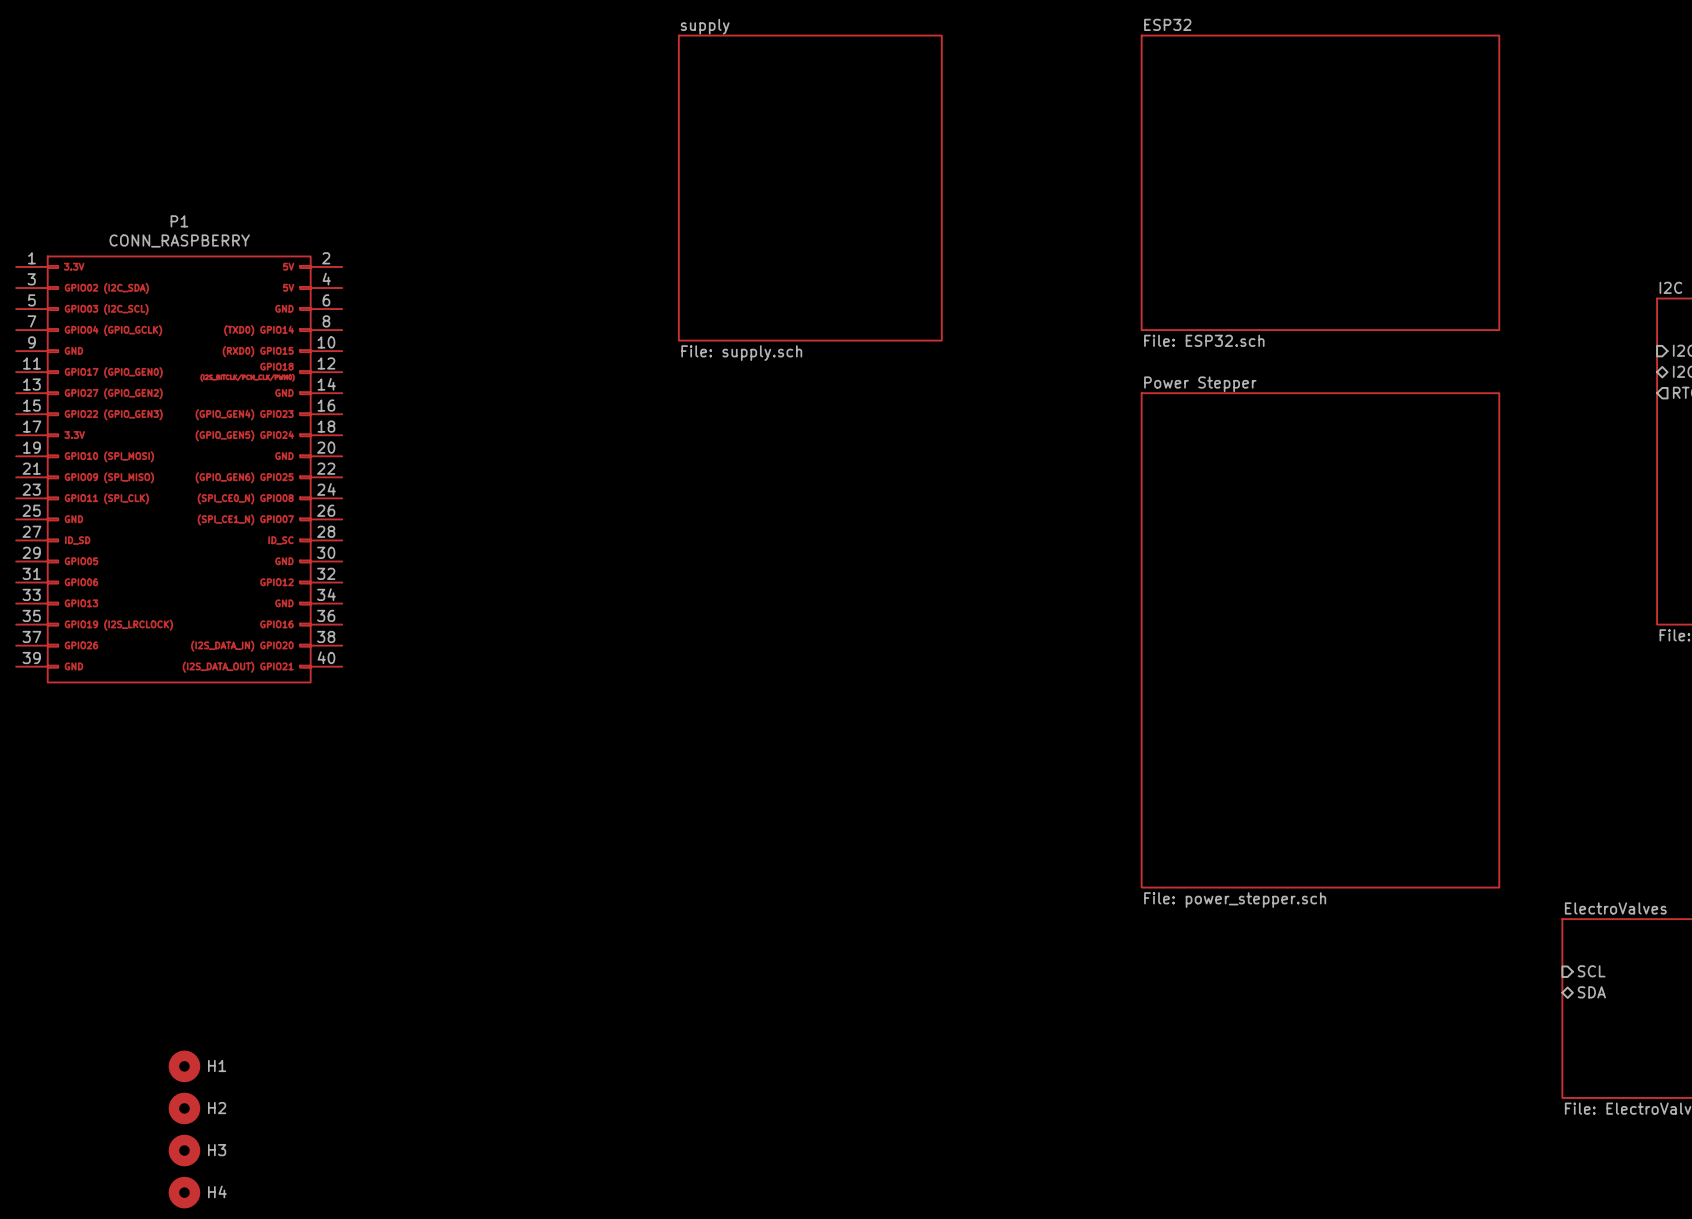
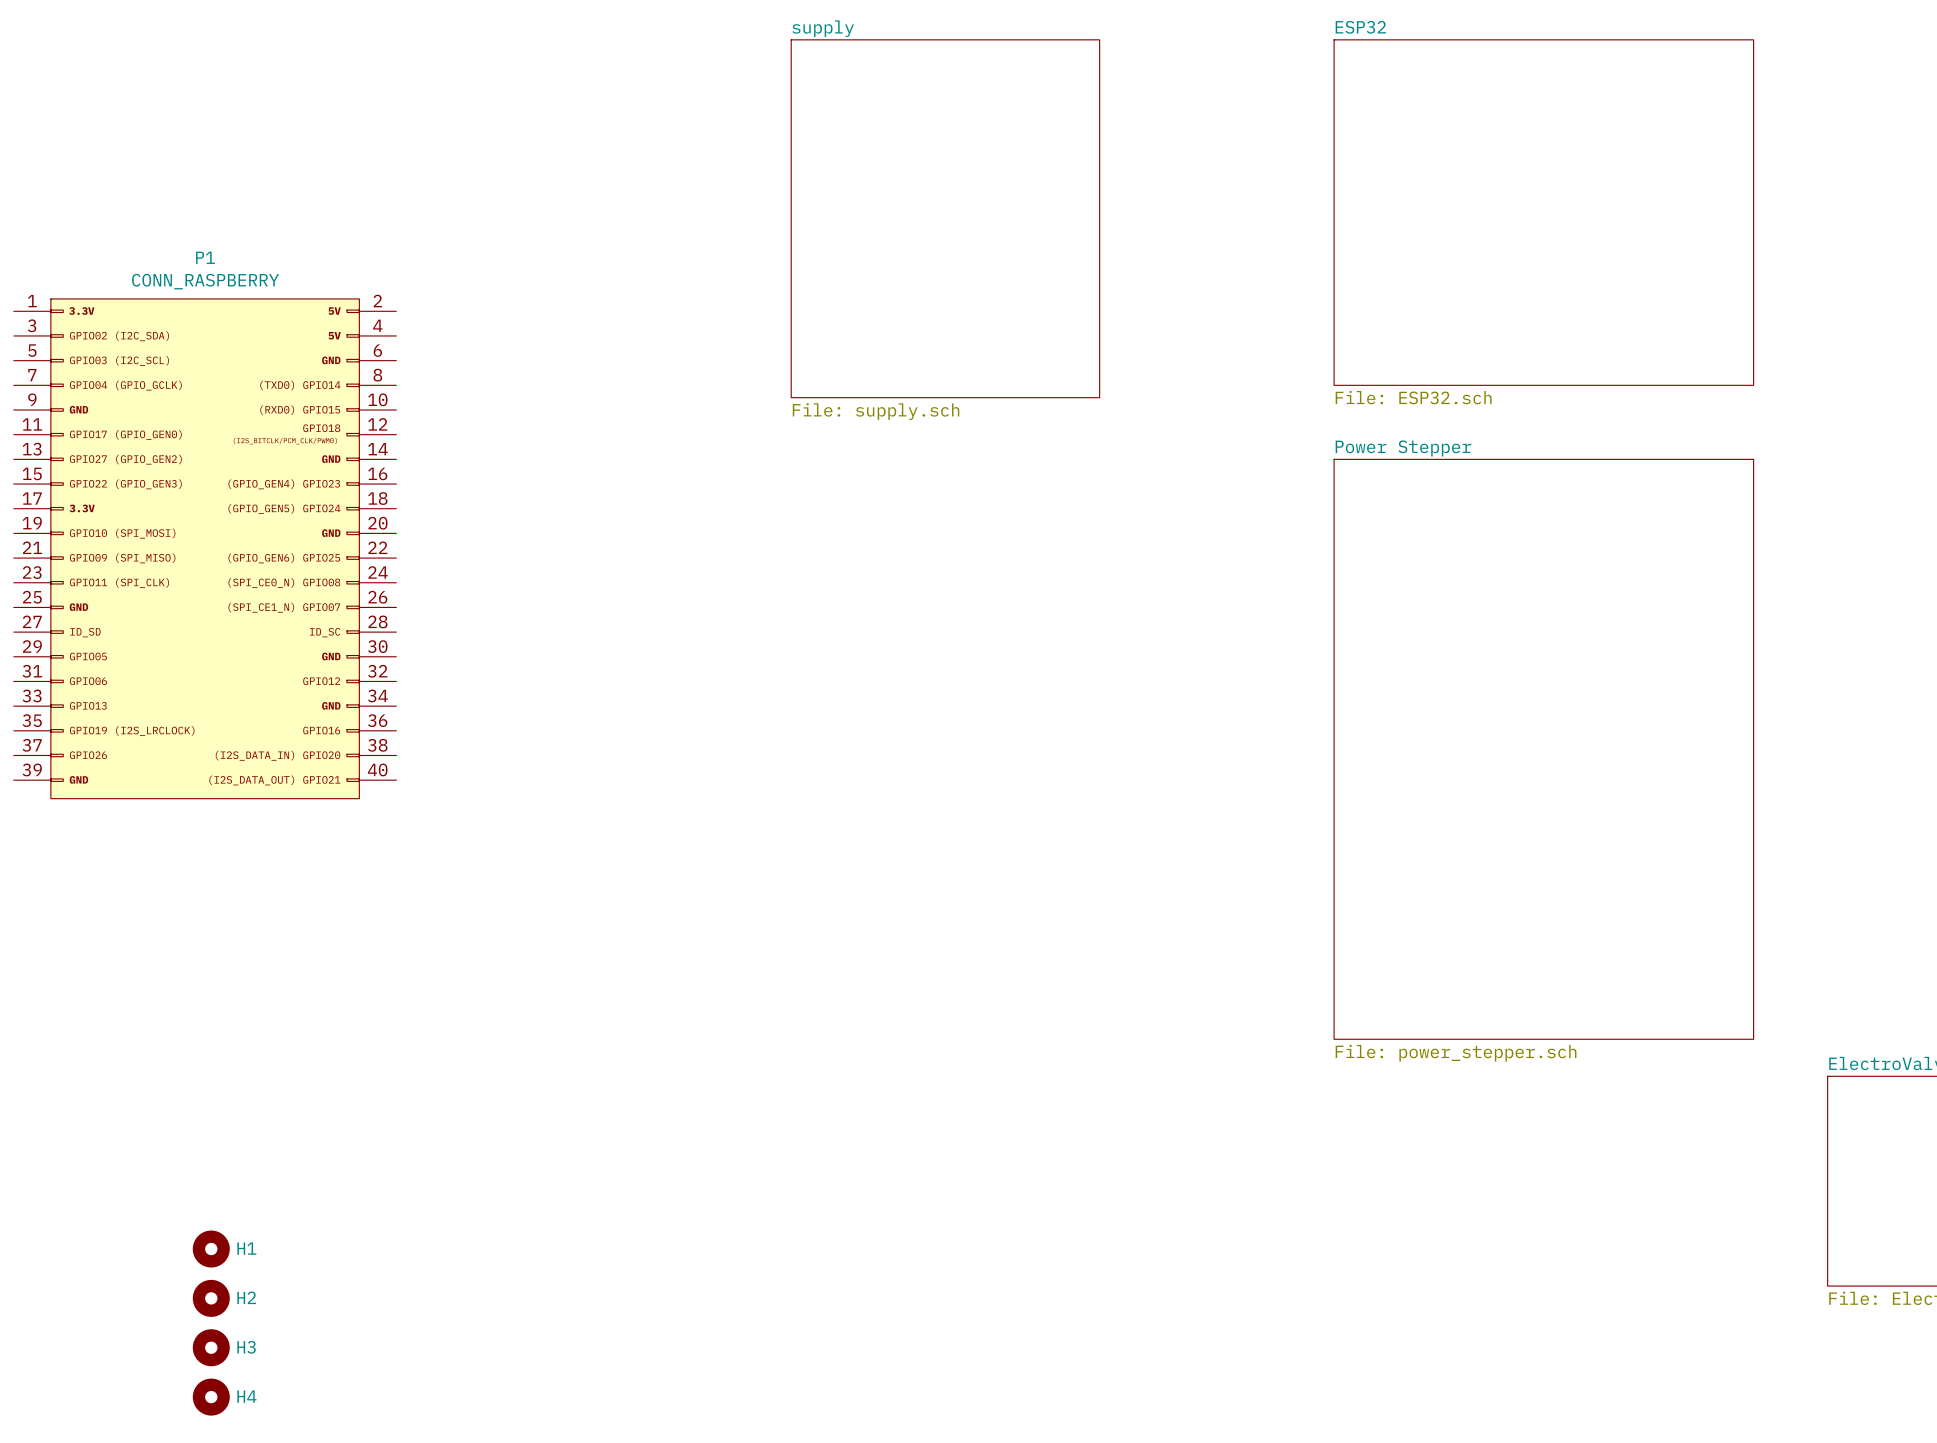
sheet pin: SCL (1591, 971) -> none
sheet pin: SDA (1591, 992) -> none

